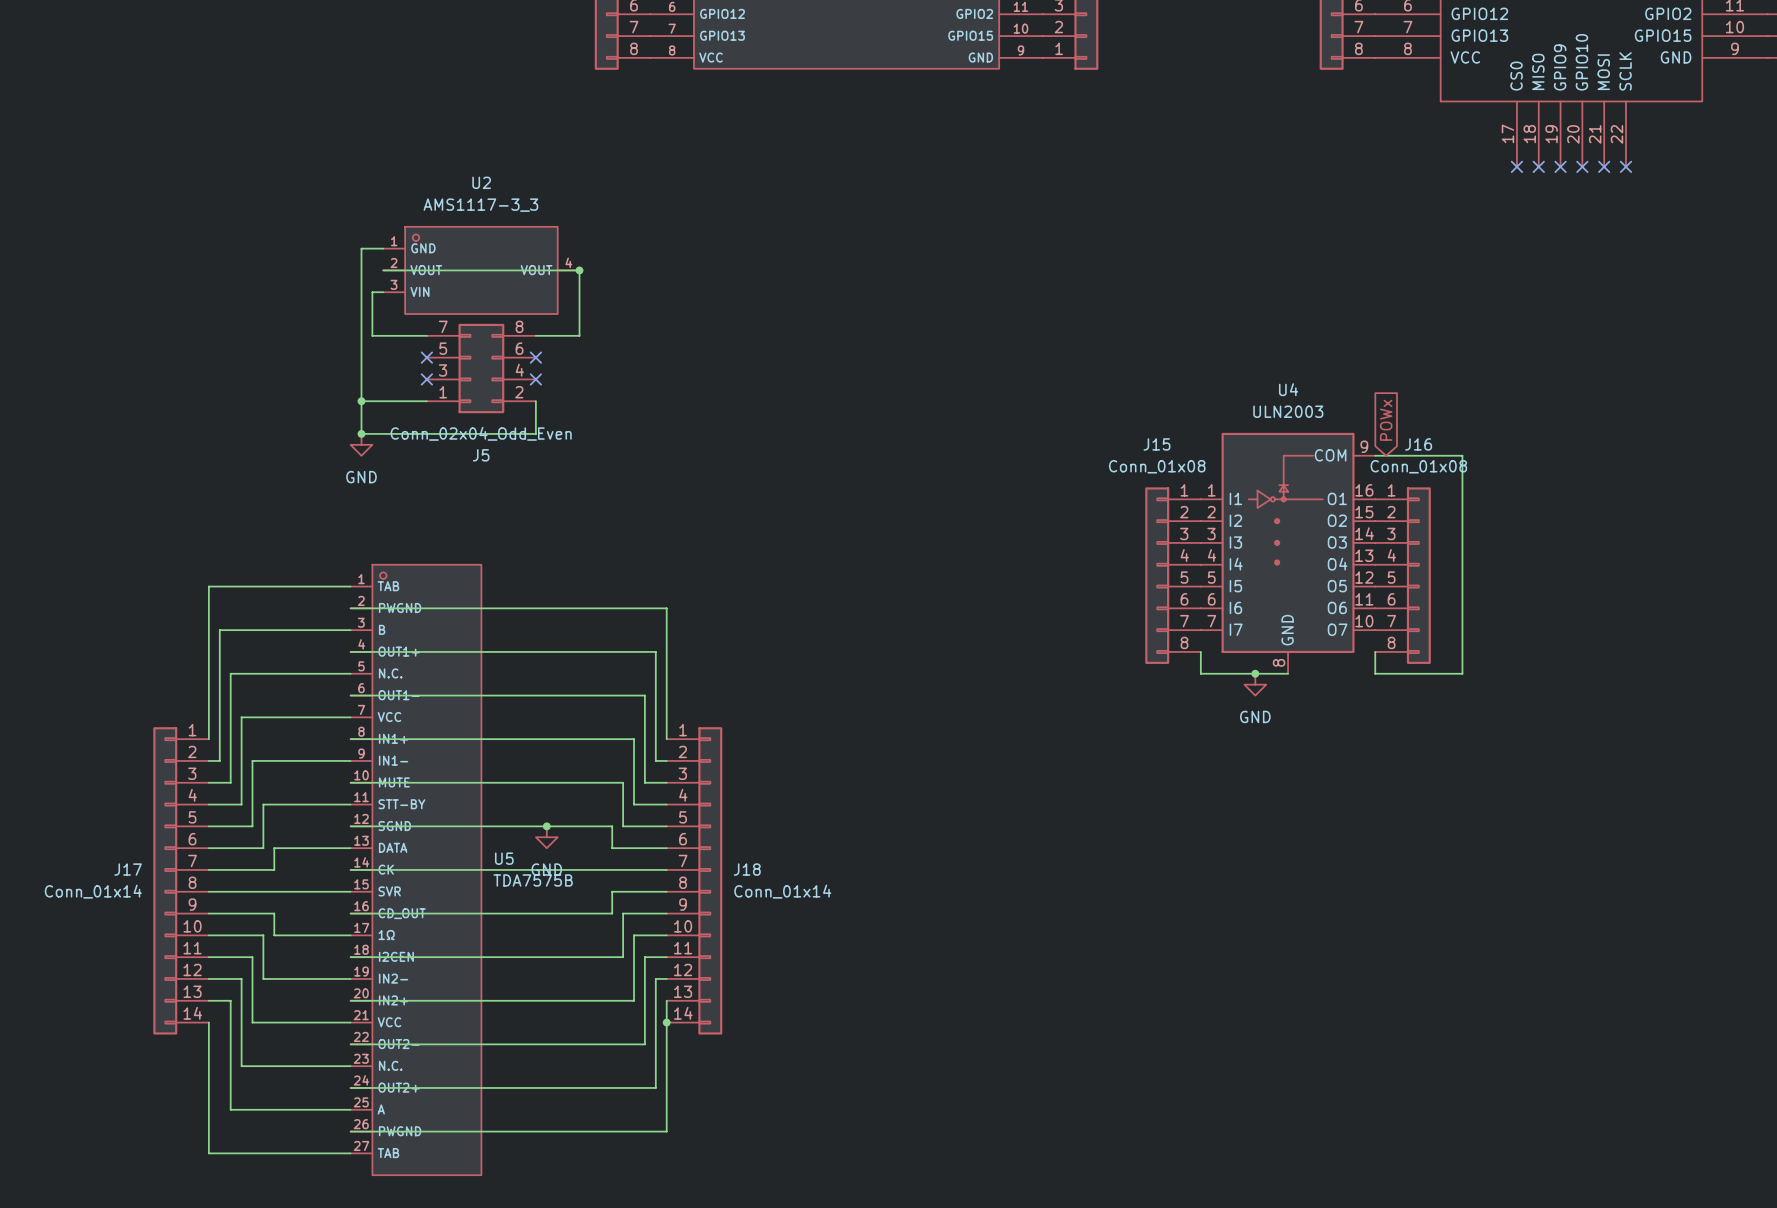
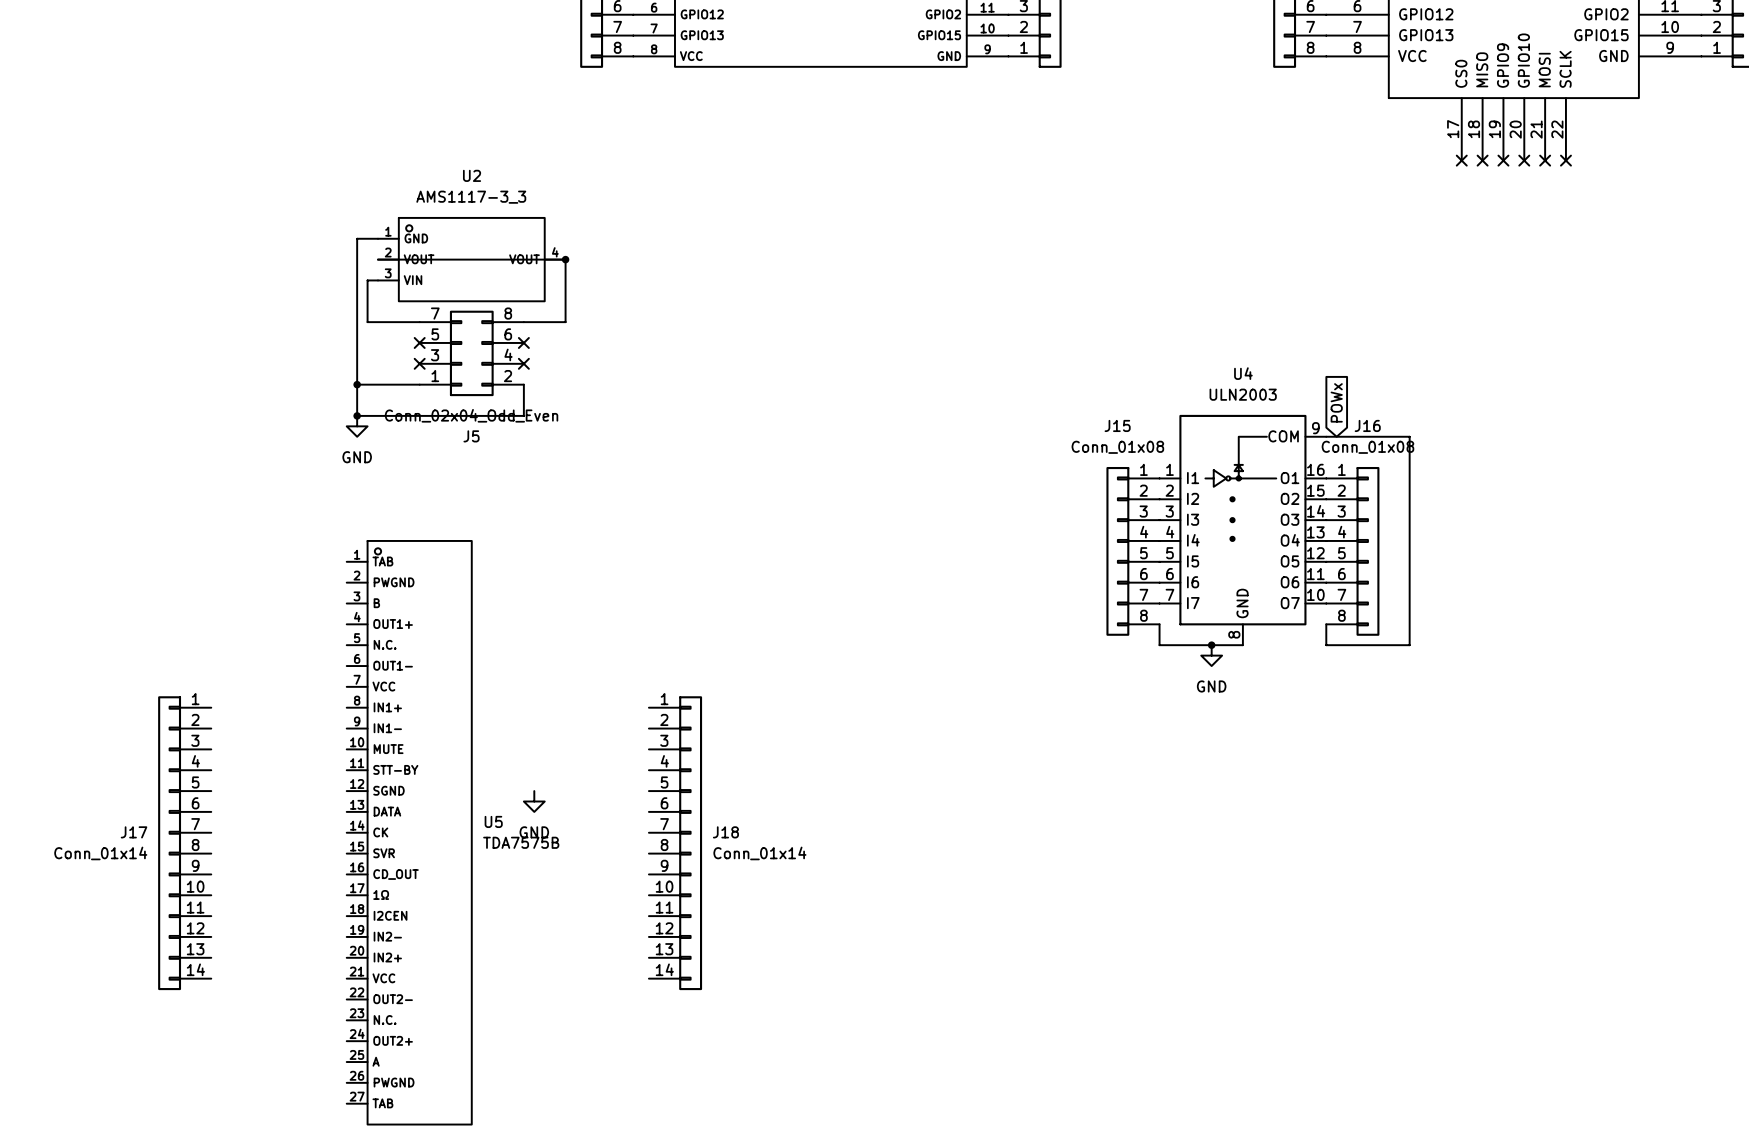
wire: (350, 586) (208, 586) (208, 739) -> none
wire: (350, 608) (666, 608) (666, 739) -> none
wire: (350, 630) (219, 630) (219, 760) (208, 760) -> none
wire: (350, 651) (655, 651) (655, 760) (666, 760) -> none
wire: (350, 673) (230, 673) (230, 782) (208, 782) -> none
wire: (350, 695) (644, 695) (644, 782) (666, 782) -> none
wire: (350, 717) (241, 717) (241, 804) (208, 804) -> none
wire: (350, 739) (634, 739) (634, 804) (666, 804) -> none
wire: (350, 760) (252, 760) (252, 826) (208, 826) -> none
wire: (350, 782) (623, 782) (623, 826) (666, 826) -> none
wire: (350, 804) (263, 804) (263, 848) (208, 848) -> none
wire: (350, 826) (612, 826) (612, 848) (666, 848) -> none
junction: (546, 826) -> none
wire: (350, 848) (274, 848) (274, 869) (208, 869) -> none
wire: (350, 869) (666, 869) -> none
wire: (208, 891) (350, 891) -> none
wire: (666, 891) (612, 891) (612, 913) (350, 913) -> none
wire: (208, 913) (274, 913) (274, 935) (350, 935) -> none
wire: (666, 913) (623, 913) (623, 957) (350, 957) -> none
wire: (208, 935) (263, 935) (263, 978) (350, 978) -> none
wire: (666, 935) (634, 935) (634, 1000) (350, 1000) -> none
wire: (208, 957) (252, 957) (252, 1022) (350, 1022) -> none
wire: (666, 957) (644, 957) (644, 1044) (350, 1044) -> none
wire: (208, 978) (241, 978) (241, 1066) (350, 1066) -> none
wire: (666, 978) (655, 978) (655, 1087) (350, 1087) -> none
wire: (208, 1000) (230, 1000) (230, 1109) (350, 1109) -> none
wire: (666, 1000) (666, 1131) (350, 1131) -> none
wire: (208, 1022) (208, 1153) (350, 1153) -> none
junction: (666, 1022) -> none

